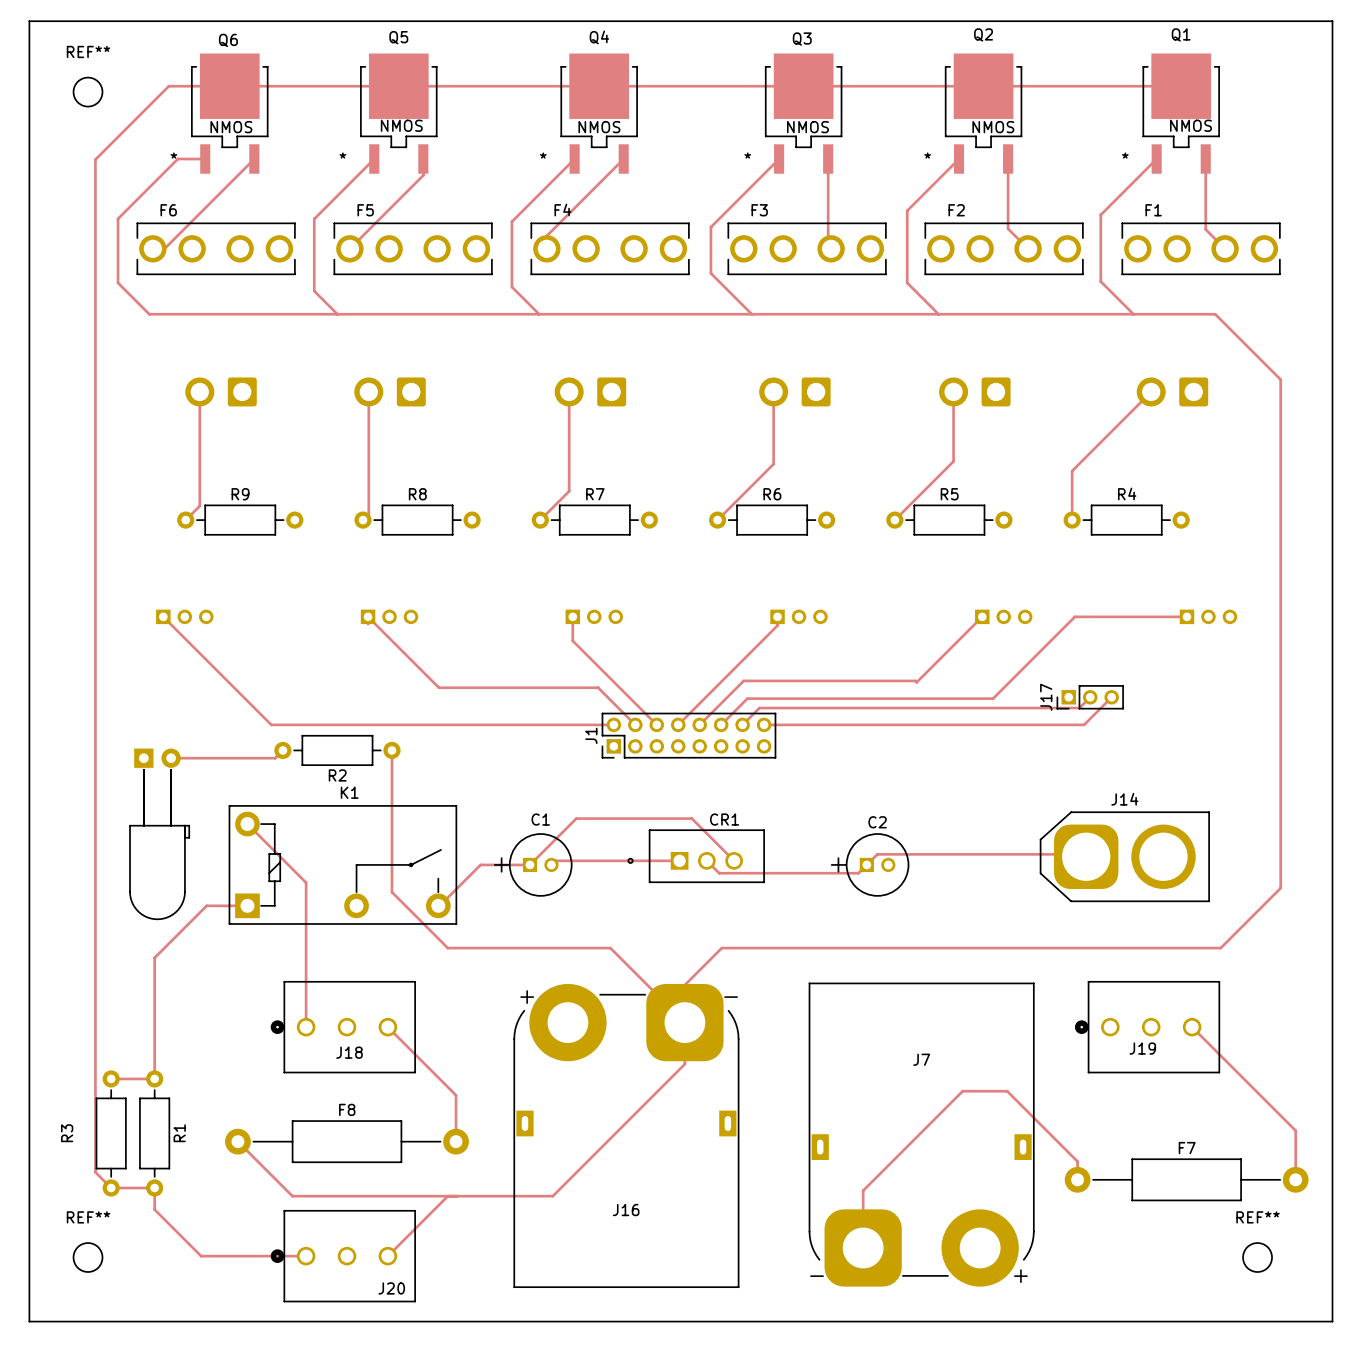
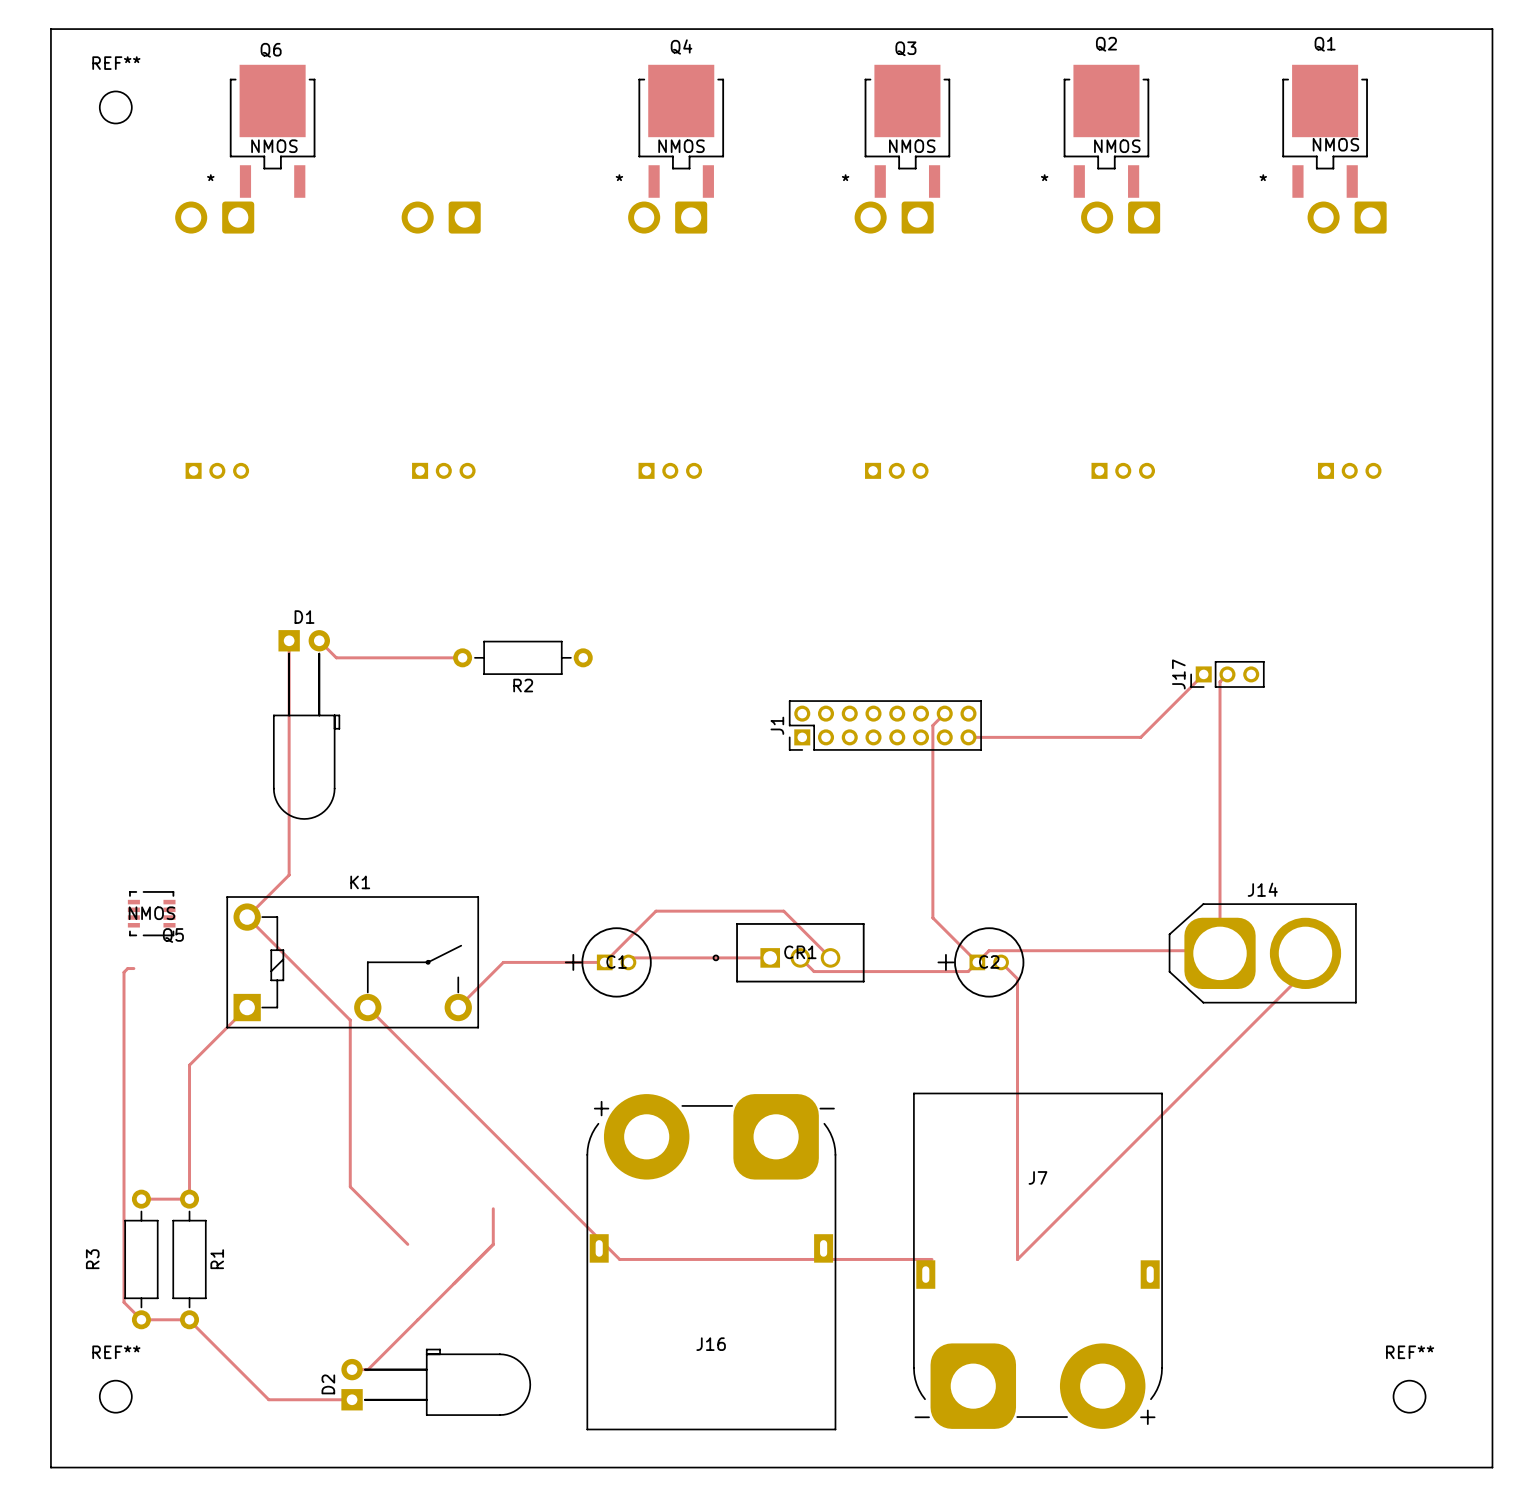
Q5 name position: Q5 (398, 37) -> Q5 (173, 935)
Q5 footprint: [360, 53, 438, 174] -> [127, 891, 176, 937]
track: (1181, 86) (168, 86) (95, 159) (95, 873) -> (133, 968) (127, 968) (124, 972)
track: (205, 159) (177, 159) (118, 218) (118, 282) (149, 314) (1215, 314) (1280, 379) (1280, 888) (1220, 948) (721, 948) (684, 985) (684, 1064) (552, 1196) (292, 1196) (237, 1141) -> none
track: (254, 159) (164, 248) (152, 248) -> none
track: (374, 159) (314, 218) -> none
track: (423, 159) (423, 175) (349, 248) -> none
track: (574, 159) (511, 221) (511, 287) (539, 314) -> none
track: (623, 159) (546, 235) (546, 248) -> none
track: (779, 159) (711, 227) -> none
track: (828, 159) (828, 245) (831, 248) -> none
track: (959, 159) (907, 210) (907, 282) (938, 314) -> none
track: (1008, 159) (1008, 228) (1028, 248) -> none
track: (1156, 159) (1100, 214) (1100, 281) (1133, 314) -> none
track: (1205, 159) (1205, 229) (1225, 248) -> none
part: none -> (214, 217)
part: none -> (441, 217)
part: none -> (667, 217)
part: none -> (894, 217)
part: none -> (1120, 217)
part: none -> (1347, 217)
track: (314, 218) (314, 291) (337, 314) -> none
track: (710, 227) (710, 273) (751, 314) -> none
F6: (216, 248) -> none
F5: (413, 248) -> none
F4: (610, 248) -> none
F3: (807, 248) -> none
F2: (1004, 248) -> none
F1: (1201, 248) -> none
track: (199, 391) (199, 506) (185, 520) -> none
part: (221, 391) -> none
track: (368, 391) (368, 514) (363, 520) -> none
part: (390, 391) -> none
track: (569, 391) (569, 491) (540, 520) -> none
part: (590, 391) -> none
track: (773, 391) (773, 464) (717, 520) -> none
part: (794, 391) -> none
track: (953, 391) (953, 461) (894, 520) -> none
part: (974, 391) -> none
track: (1151, 391) (1072, 471) (1072, 520) -> none
part: (1172, 391) -> none
part: none -> (217, 470)
part: none -> (443, 470)
part: none -> (670, 470)
part: none -> (896, 470)
part: none -> (1123, 470)
part: none -> (1349, 470)
R9: (240, 520) -> none
R8: (417, 520) -> none
R7: (594, 520) -> none
R6: (772, 520) -> none
R5: (949, 520) -> none
R4: (1126, 520) -> none
track: none -> (289, 640) (289, 875) (247, 917) (350, 1020) (350, 1186) (407, 1244)
track: none -> (319, 640) (336, 657) (462, 657)
track: none -> (1203, 674) (1140, 737) (968, 737)
track: none -> (1227, 674) (1220, 681) (1220, 953)
track: (163, 616) (271, 724) (613, 724) -> none
part: (184, 616) -> none
part: (389, 616) -> none
track: (572, 616) (572, 640) (656, 724) -> none
part: (594, 616) -> none
track: (777, 616) (777, 625) (678, 724) -> none
part: (798, 616) -> none
track: (982, 616) (916, 682) (743, 680) (699, 724) -> none
part: (1003, 616) -> none
track: (1187, 616) (1074, 616) (993, 698) (747, 698) (721, 724) -> none
part: (1208, 616) -> none
track: (368, 624) (368, 616) (438, 687) (598, 687) (635, 724) -> none
track: none -> (944, 713) (932, 725) (932, 917) (977, 962)
D1: none -> (306, 724)
track: (1090, 697) (1079, 708) (759, 708) (742, 724) -> none
J17 position: (1090, 697) -> (1227, 674)
track: (1111, 697) (1084, 724) (764, 724) -> none
J1 position: (688, 735) -> (885, 725)
track: (282, 750) (275, 758) (171, 758) -> none
R2 position: (337, 750) -> (522, 657)
track: (391, 750) (391, 892) (447, 948) (610, 948) (684, 1022) -> none
C1 name position: C1 (540, 819) -> C1 (616, 961)
CR1 name position: CR1 (724, 819) -> CR1 (800, 952)
C2 name position: C2 (877, 822) -> C2 (989, 961)
track: (247, 824) (306, 882) (306, 1027) -> none
part: (159, 834) -> none
K1 position: (342, 864) -> (352, 962)
track: (480, 864) (438, 905) -> (550, 962) (503, 962) (458, 1007)
track: none -> (1001, 962) (1017, 978) (1017, 1259) (1305, 971)
track: (206, 905) (247, 905) -> none
track: none -> (367, 1007) (619, 1259) (932, 1259)
J18: (343, 1027) -> none
track: (387, 1027) (456, 1095) (456, 1141) -> none
J19: (1147, 1027) -> none
track: (1192, 1027) (1295, 1130) (1295, 1179) -> none
track: none -> (493, 1208) (493, 1244) (368, 1369) (352, 1369)
F8: (347, 1141) -> none
track: (1077, 1179) (1077, 1161) (1007, 1091) (962, 1091) (863, 1190) (863, 1247) -> none
F7: (1186, 1179) -> none
track: (154, 1187) (154, 1209) (201, 1256) (306, 1256) -> none
track: none -> (194, 1325) (268, 1399) (352, 1399)
track: (447, 1196) (387, 1256) -> none
D2: none -> (436, 1382)
J20: (343, 1256) -> none

